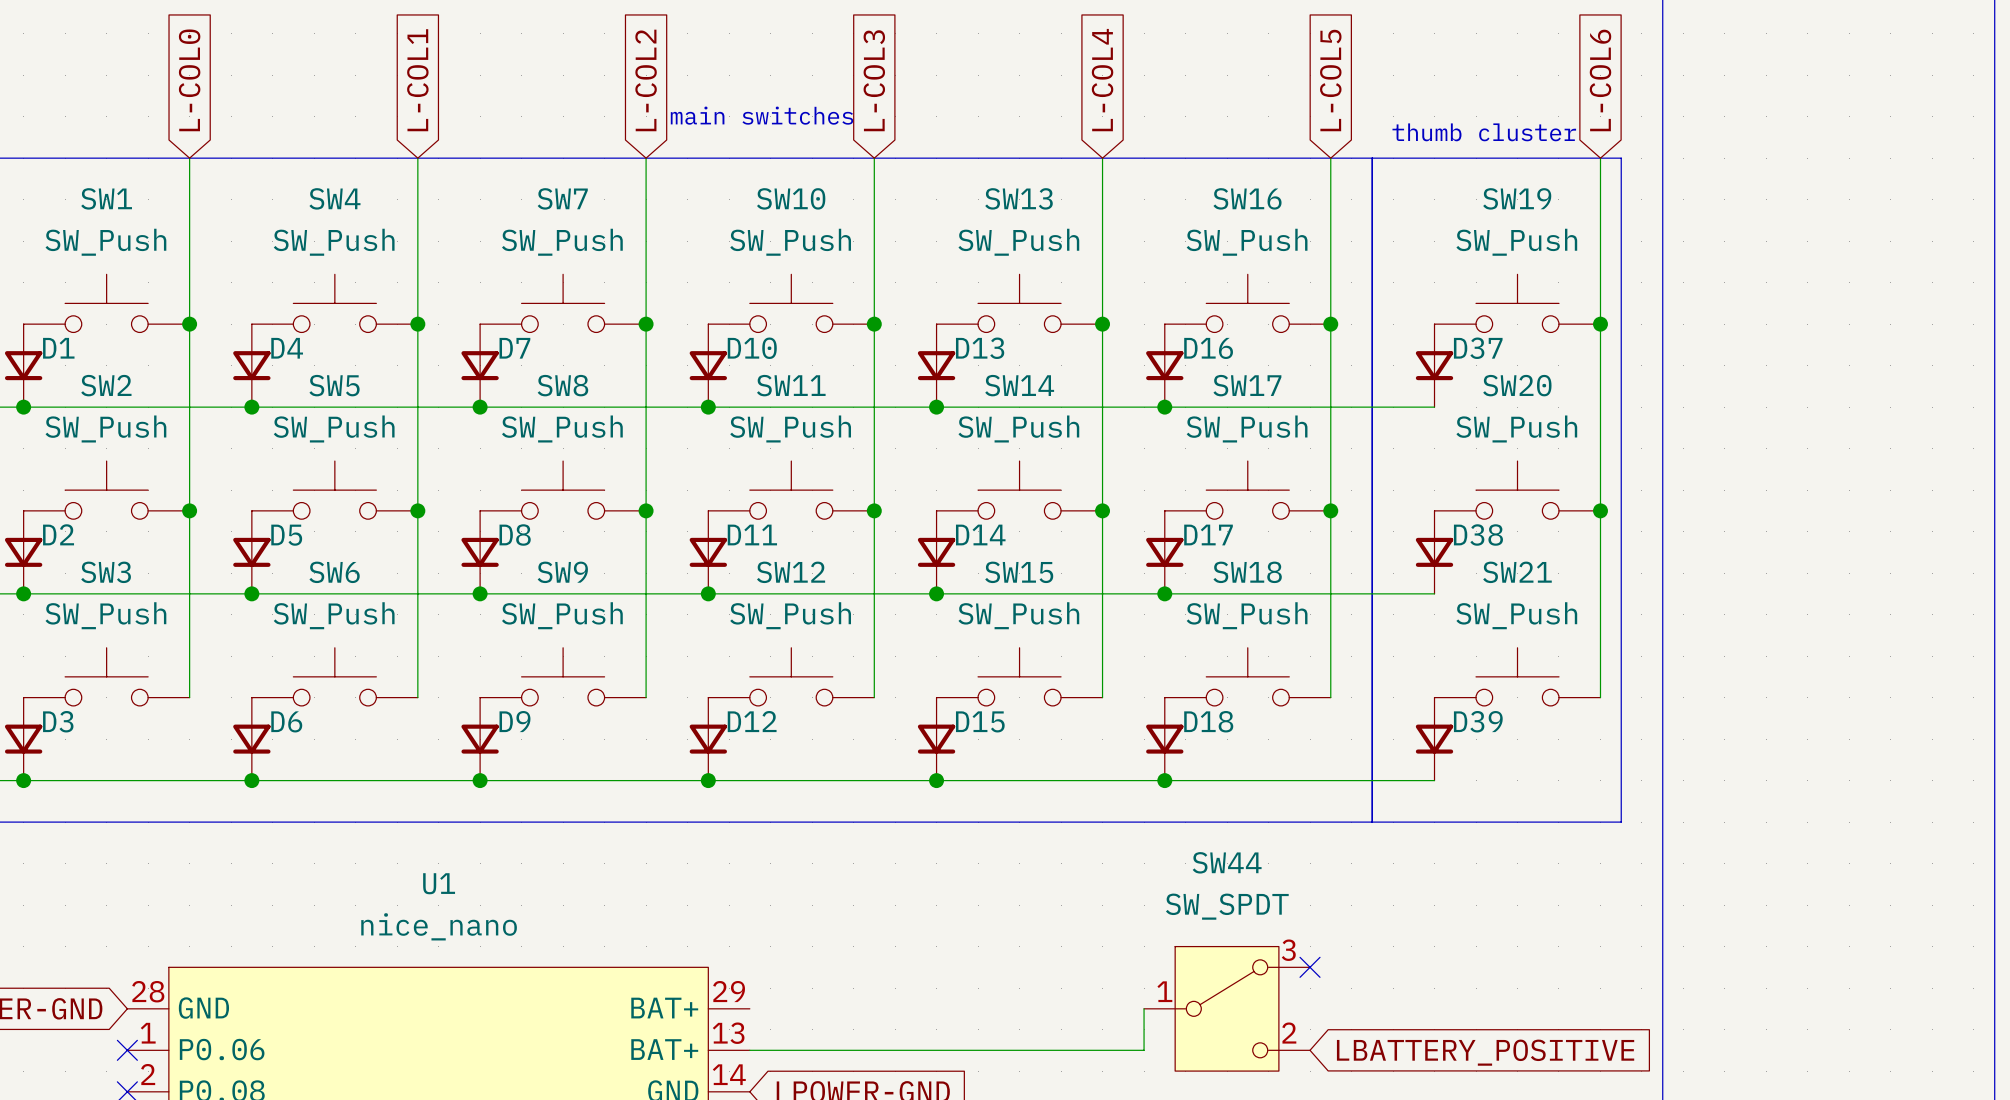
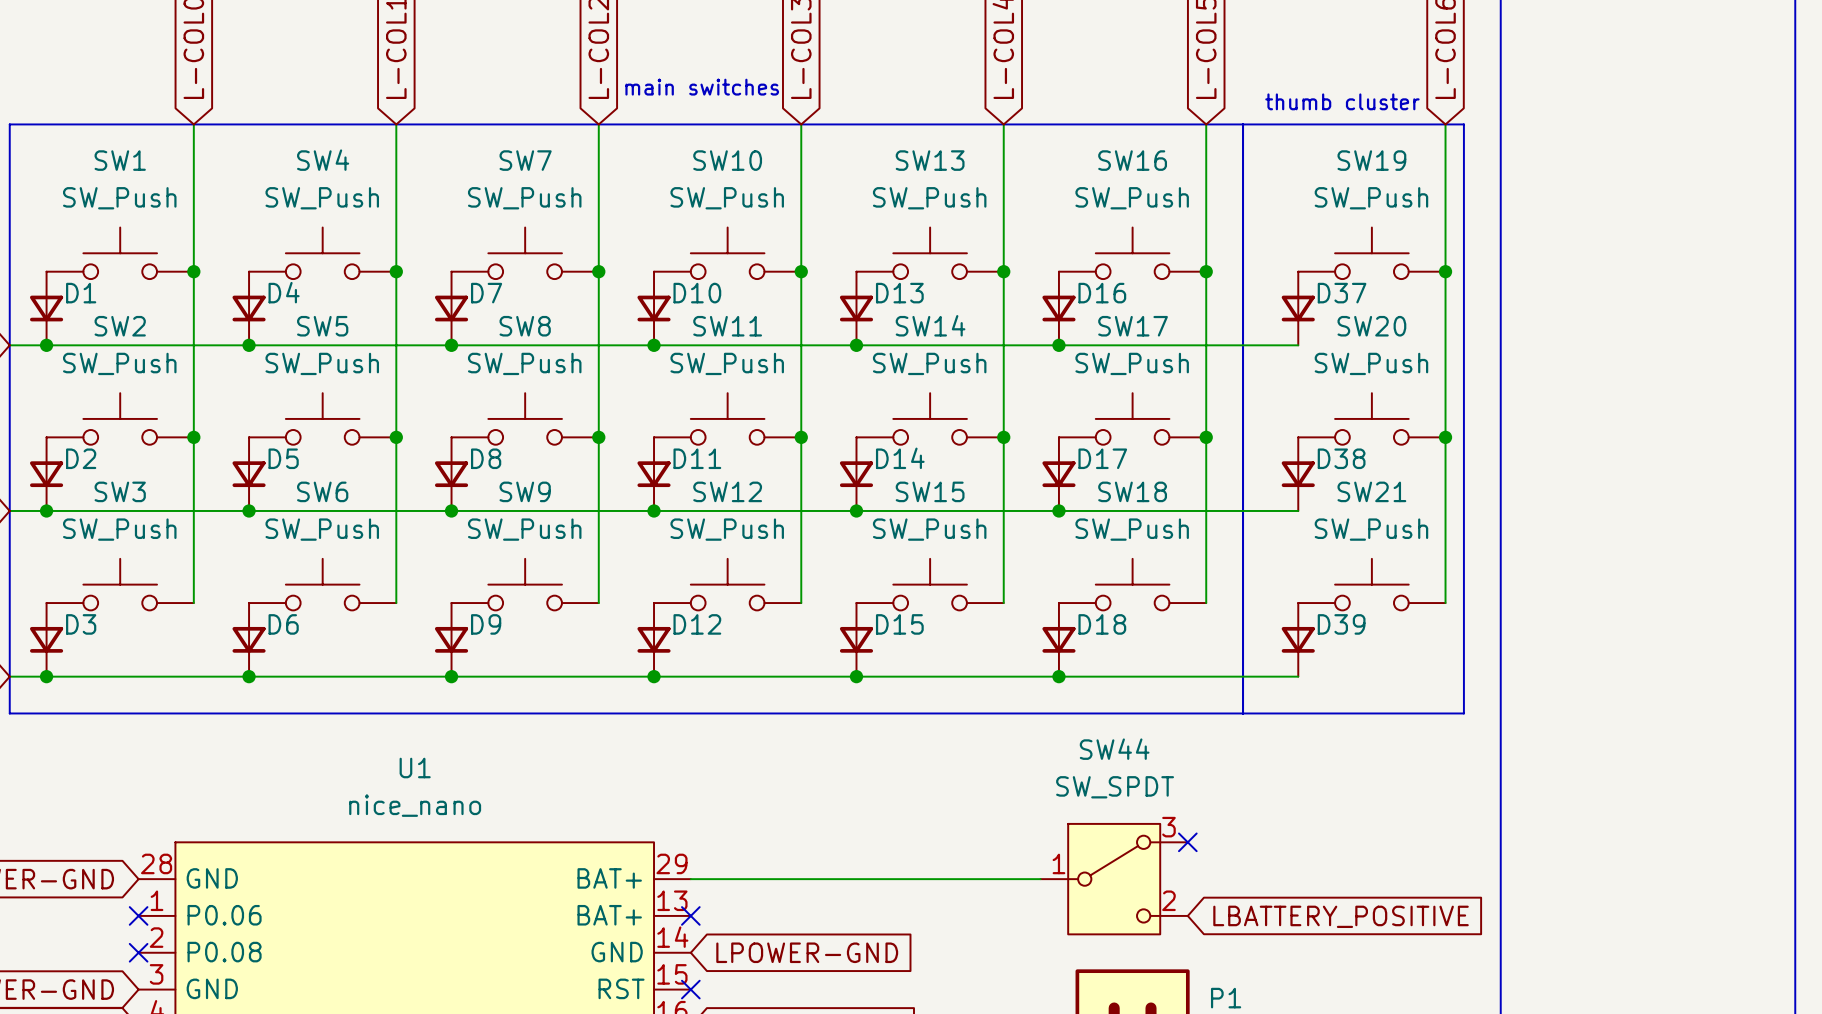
wire: (1144, 1008) (1144, 1050) (749, 1050) -> (1040, 879) (690, 879)
no-connect mark: none -> (690, 915)

